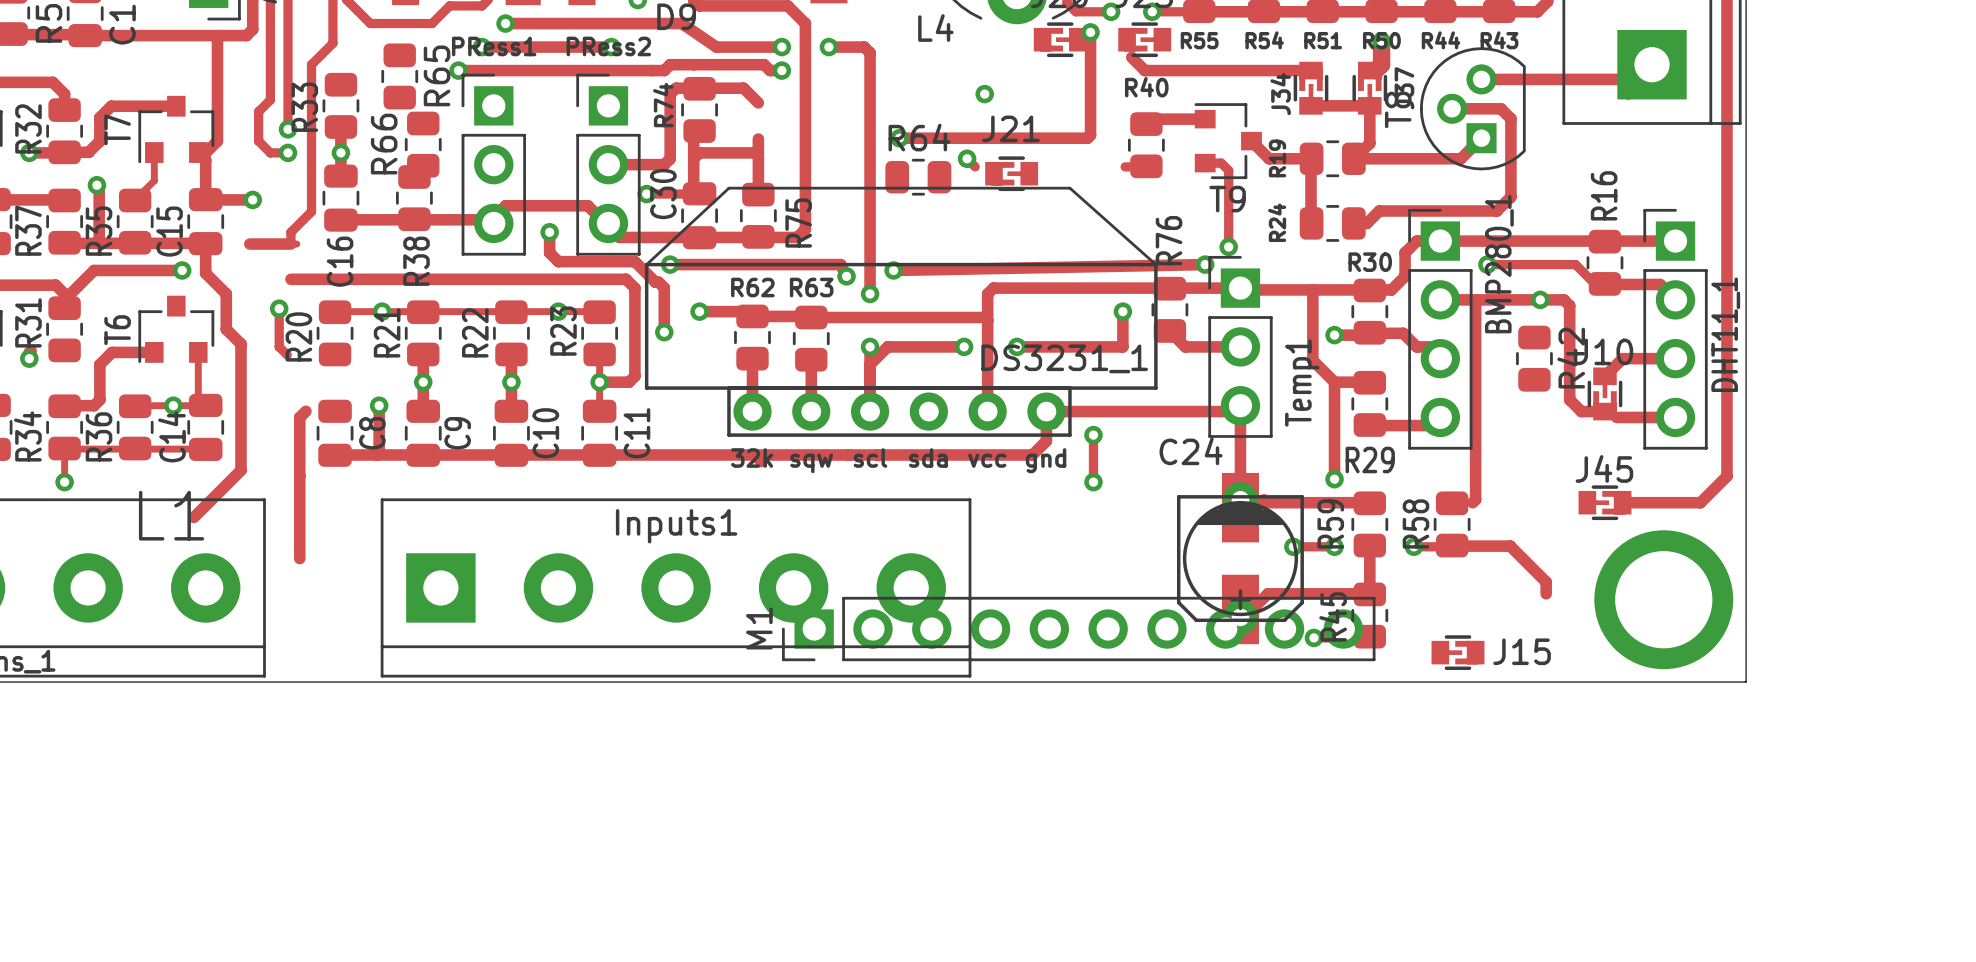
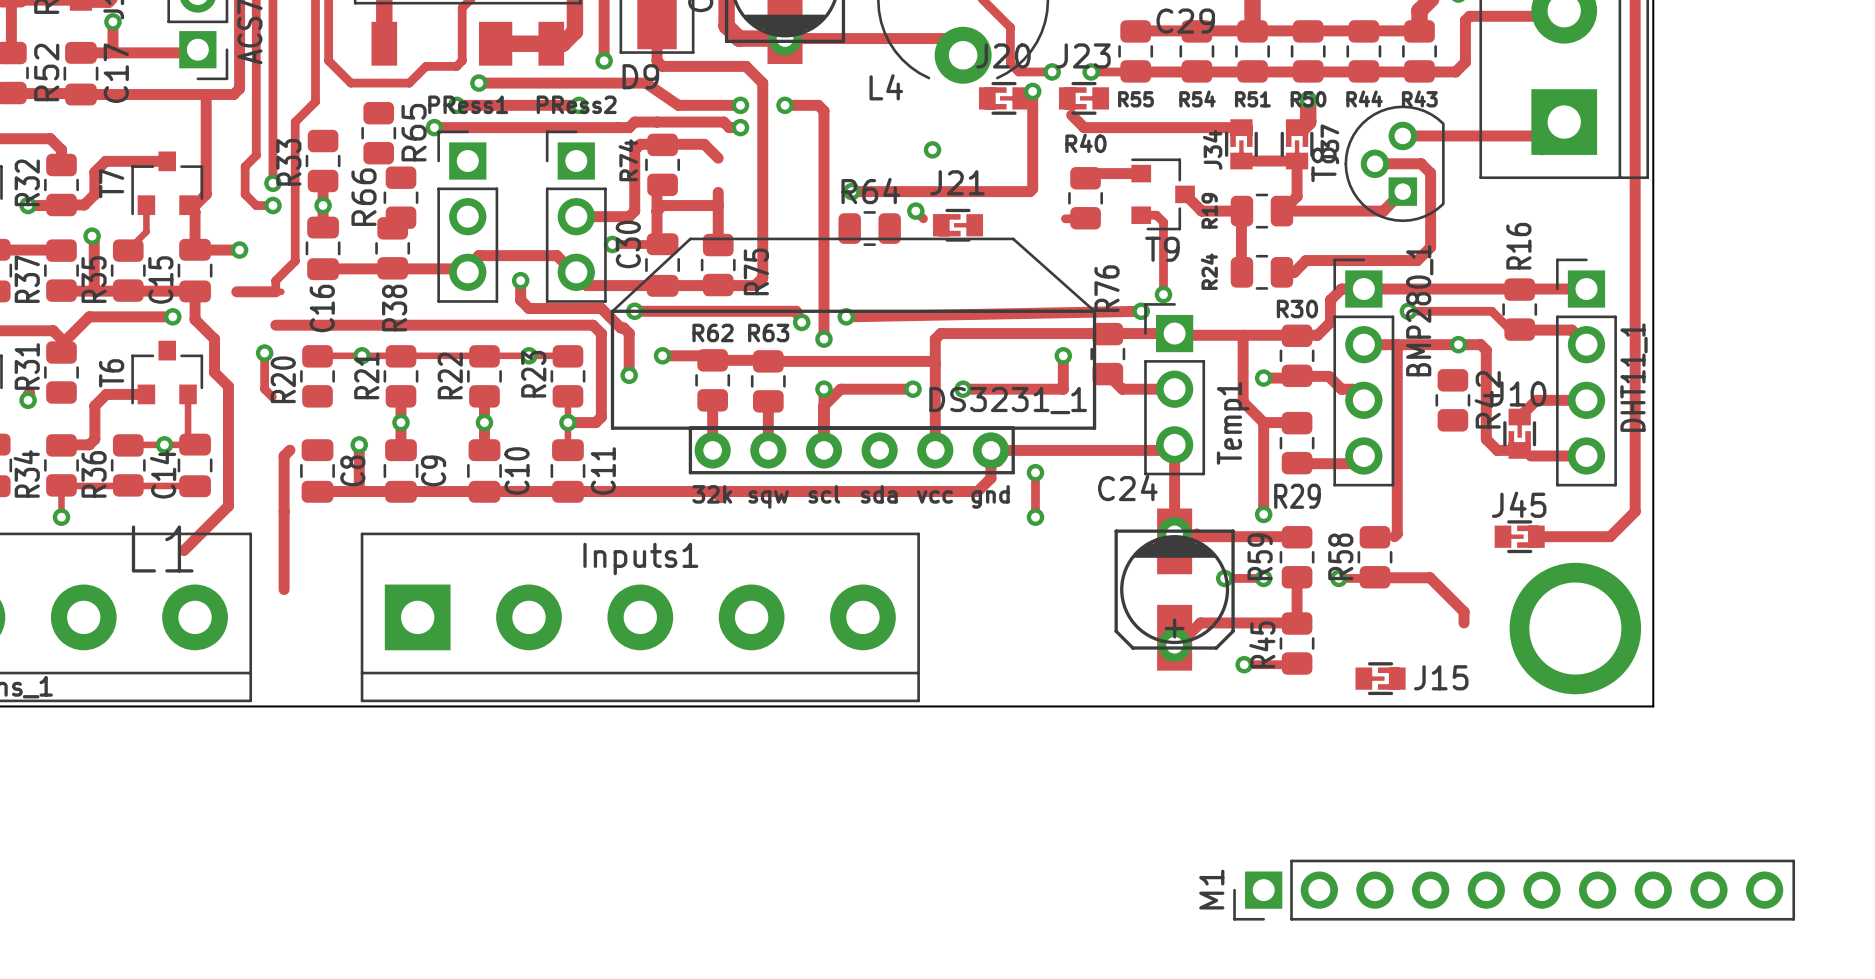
M1 position: (1078, 629) -> (1514, 890)

